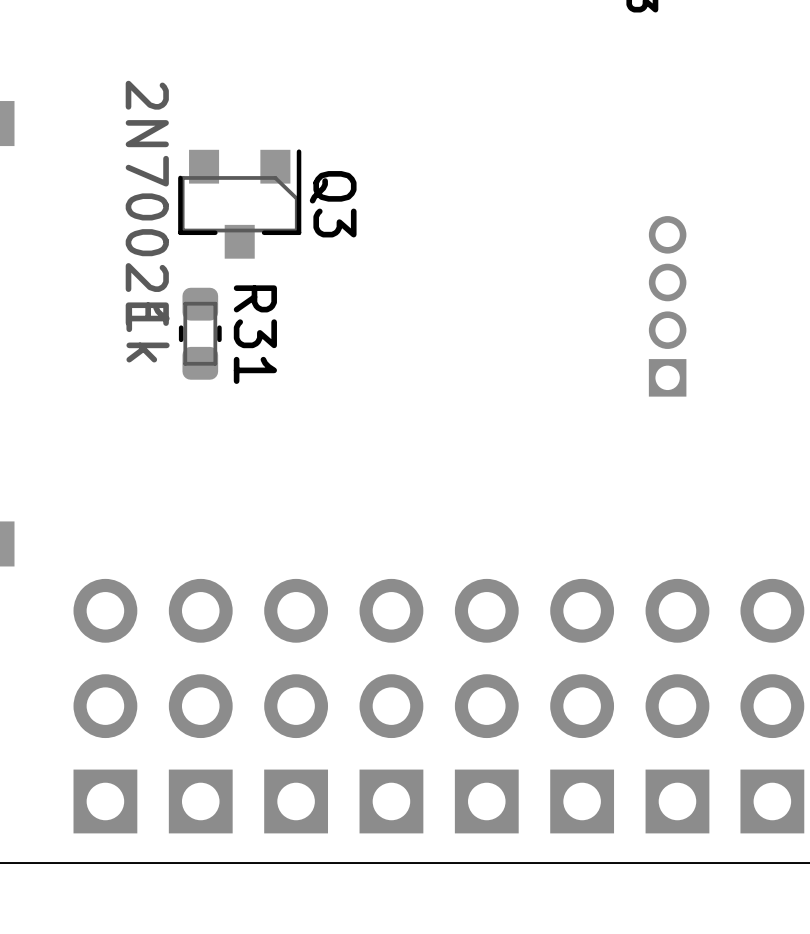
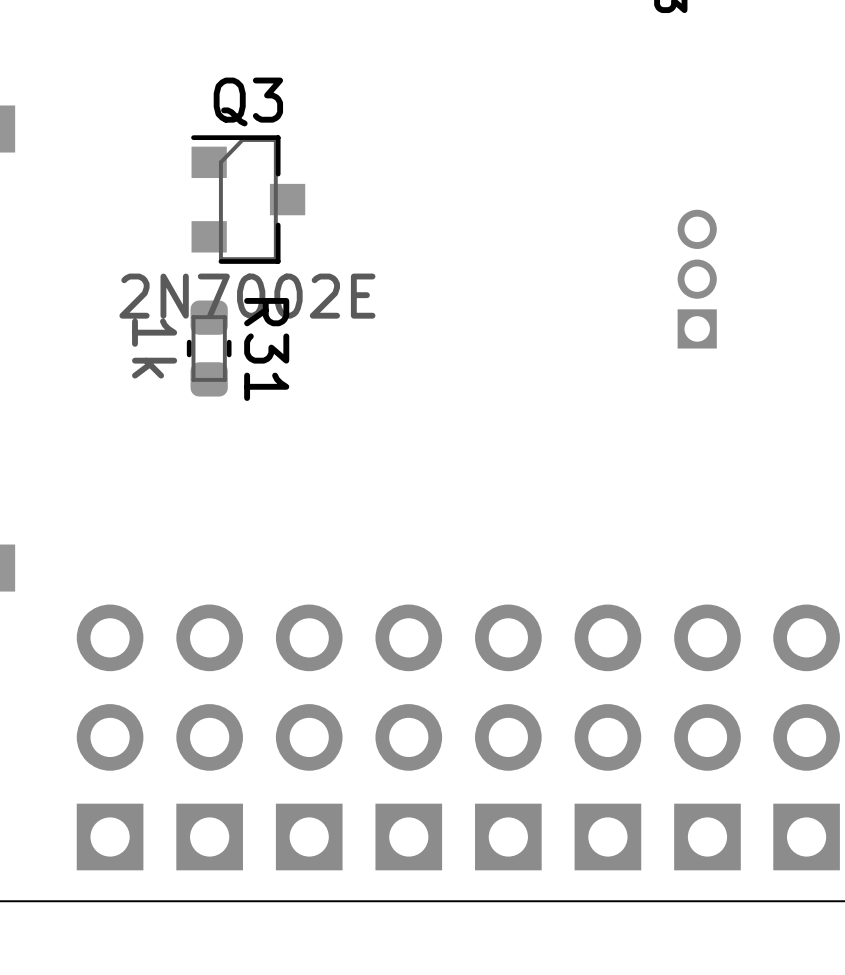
Q3 rotation: 0° (239, 204) -> 90° counterclockwise (248, 199)
part: none -> (697, 279)
part: (667, 306) -> none

